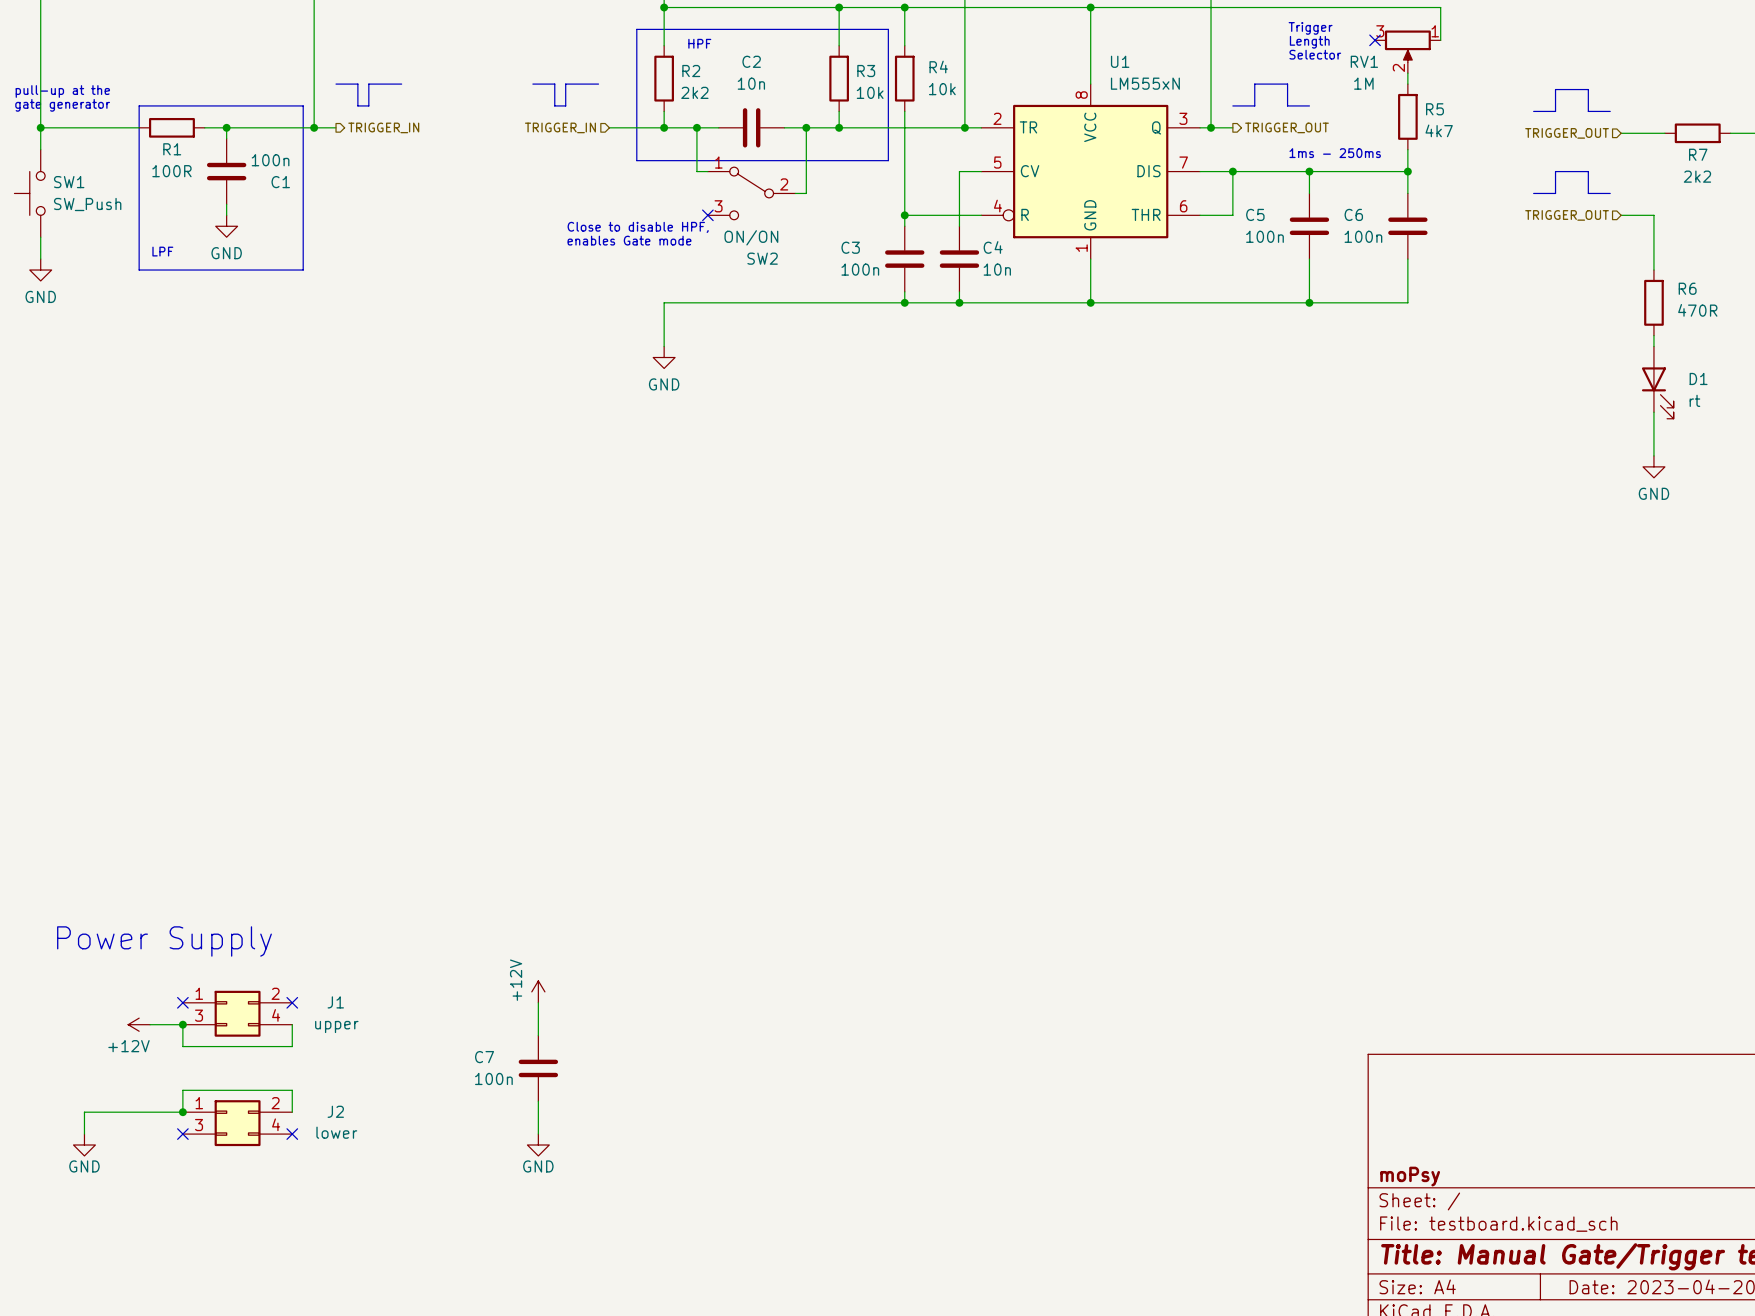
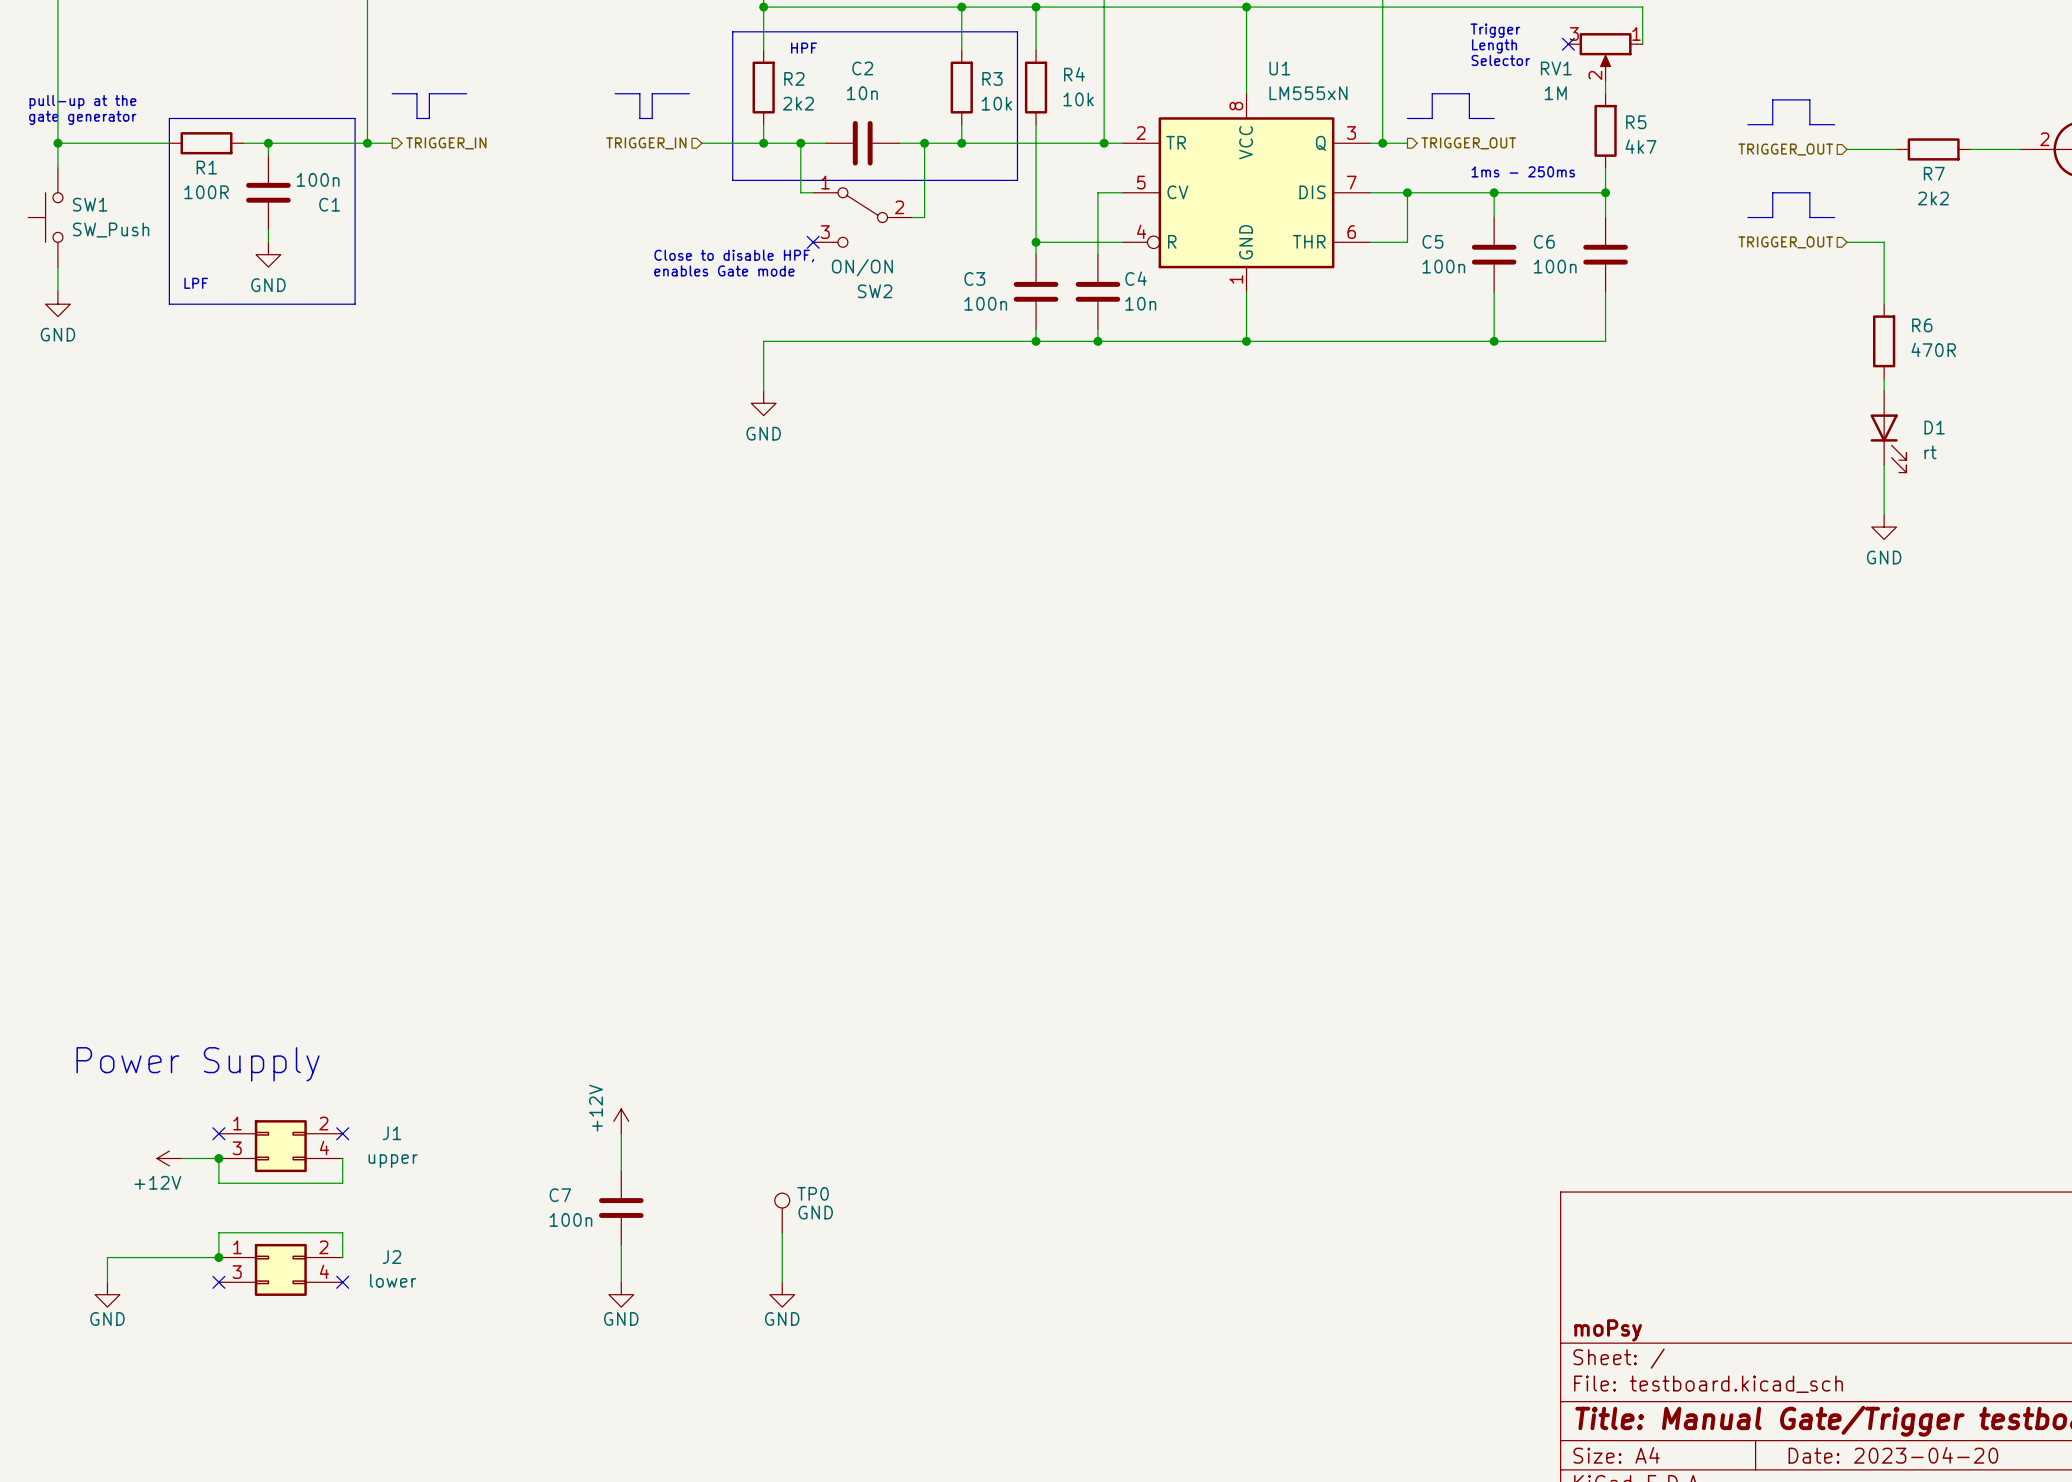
TP0: none -> GND (782, 1212)
wire: none -> (782, 1232) (782, 1282)
power symbol: none -> GND (782, 1294)

